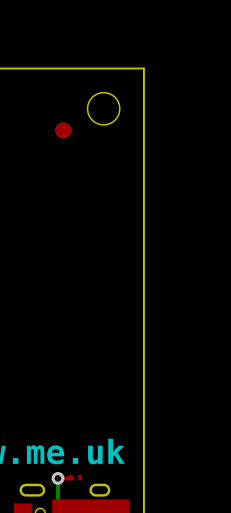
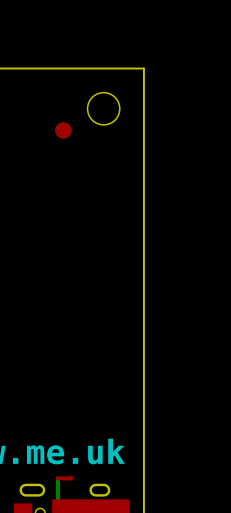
part: (75, 477) -> none
via: (57, 478) -> none

